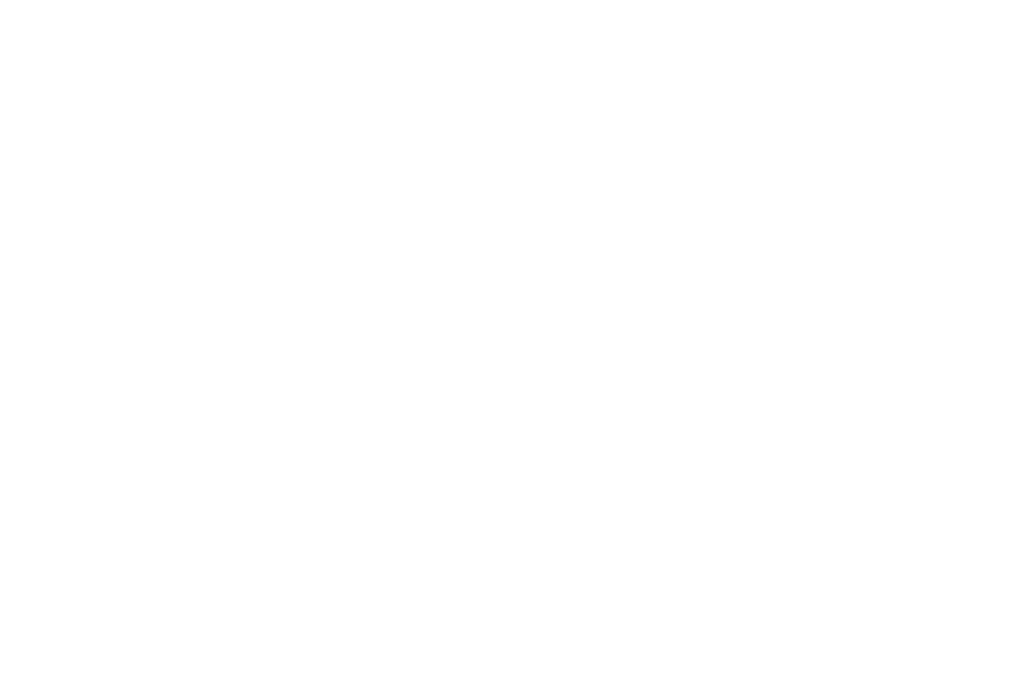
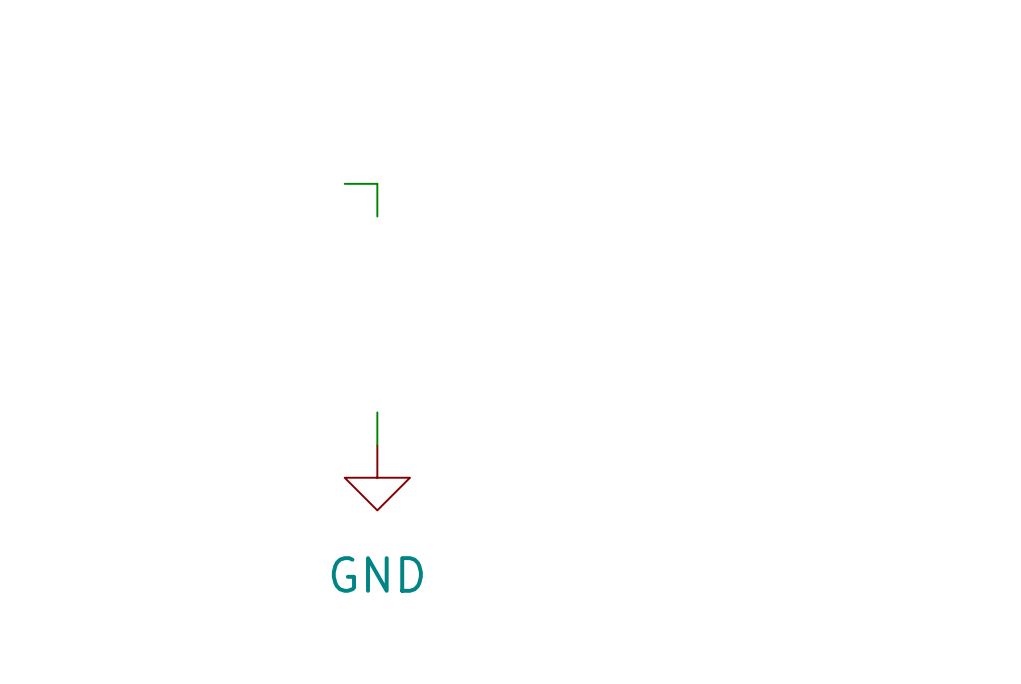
wire: none -> (344, 183) (377, 183) (377, 216)
wire: none -> (377, 412) (377, 445)
power symbol: none -> GND (377, 477)

